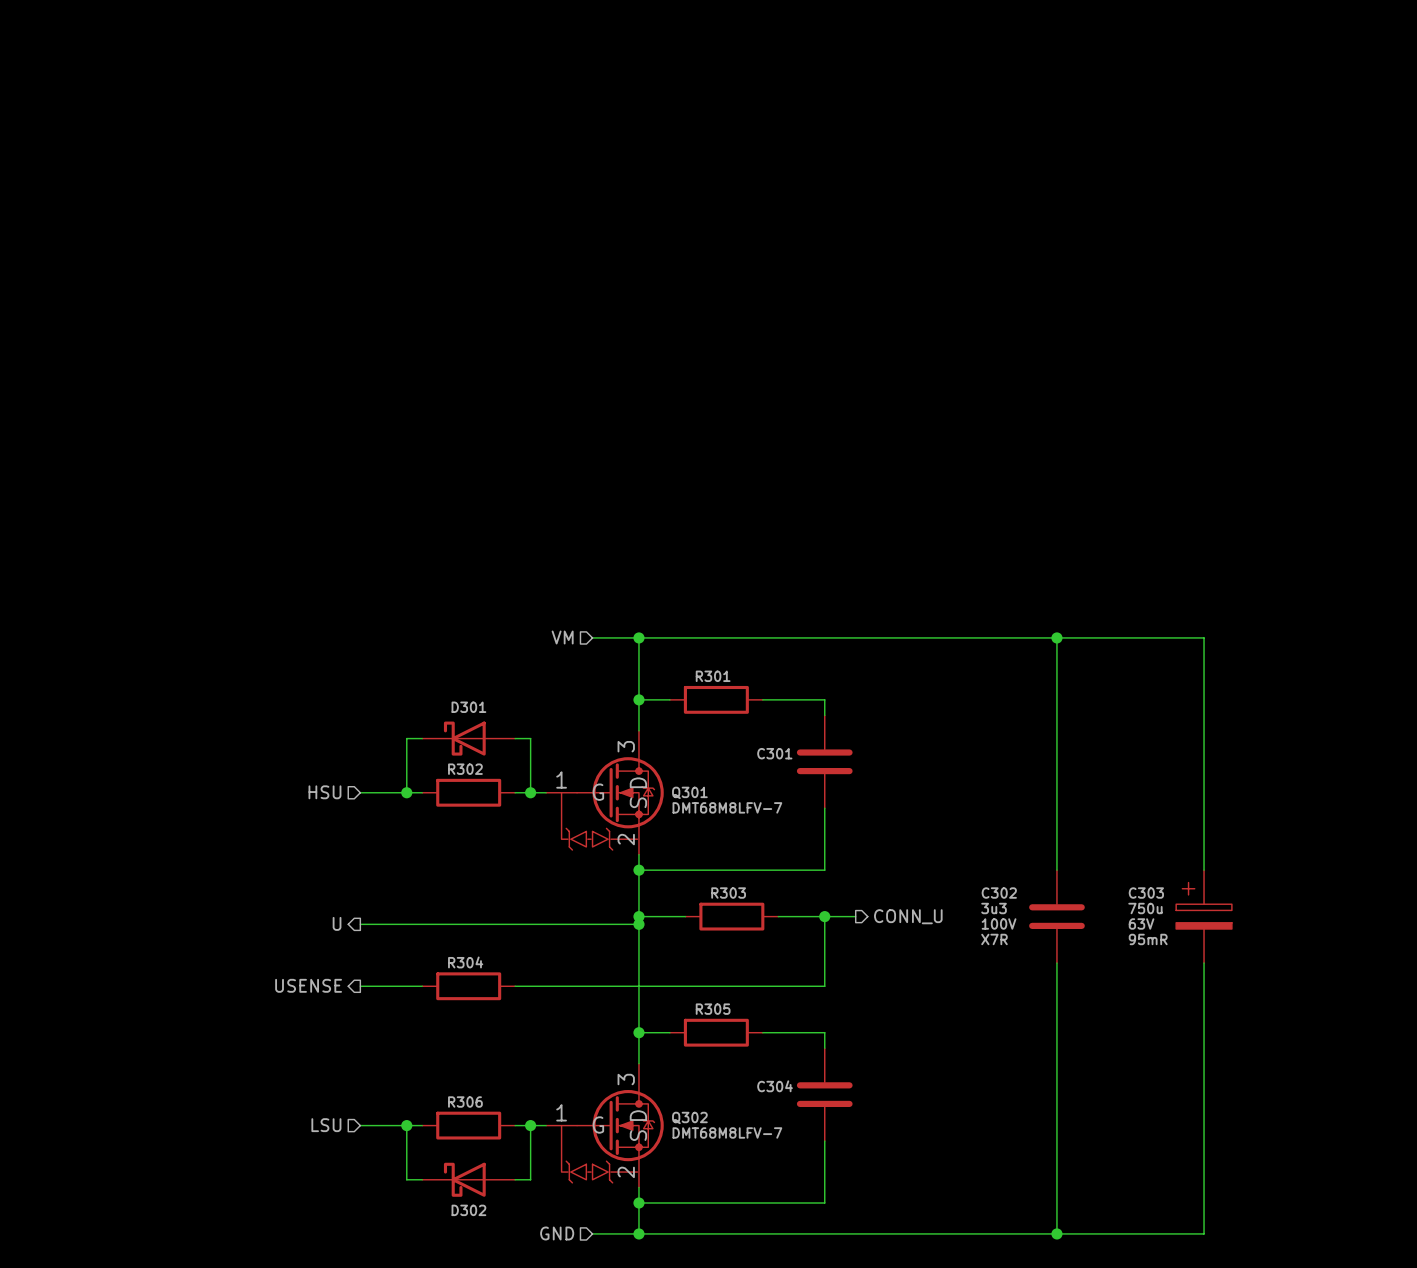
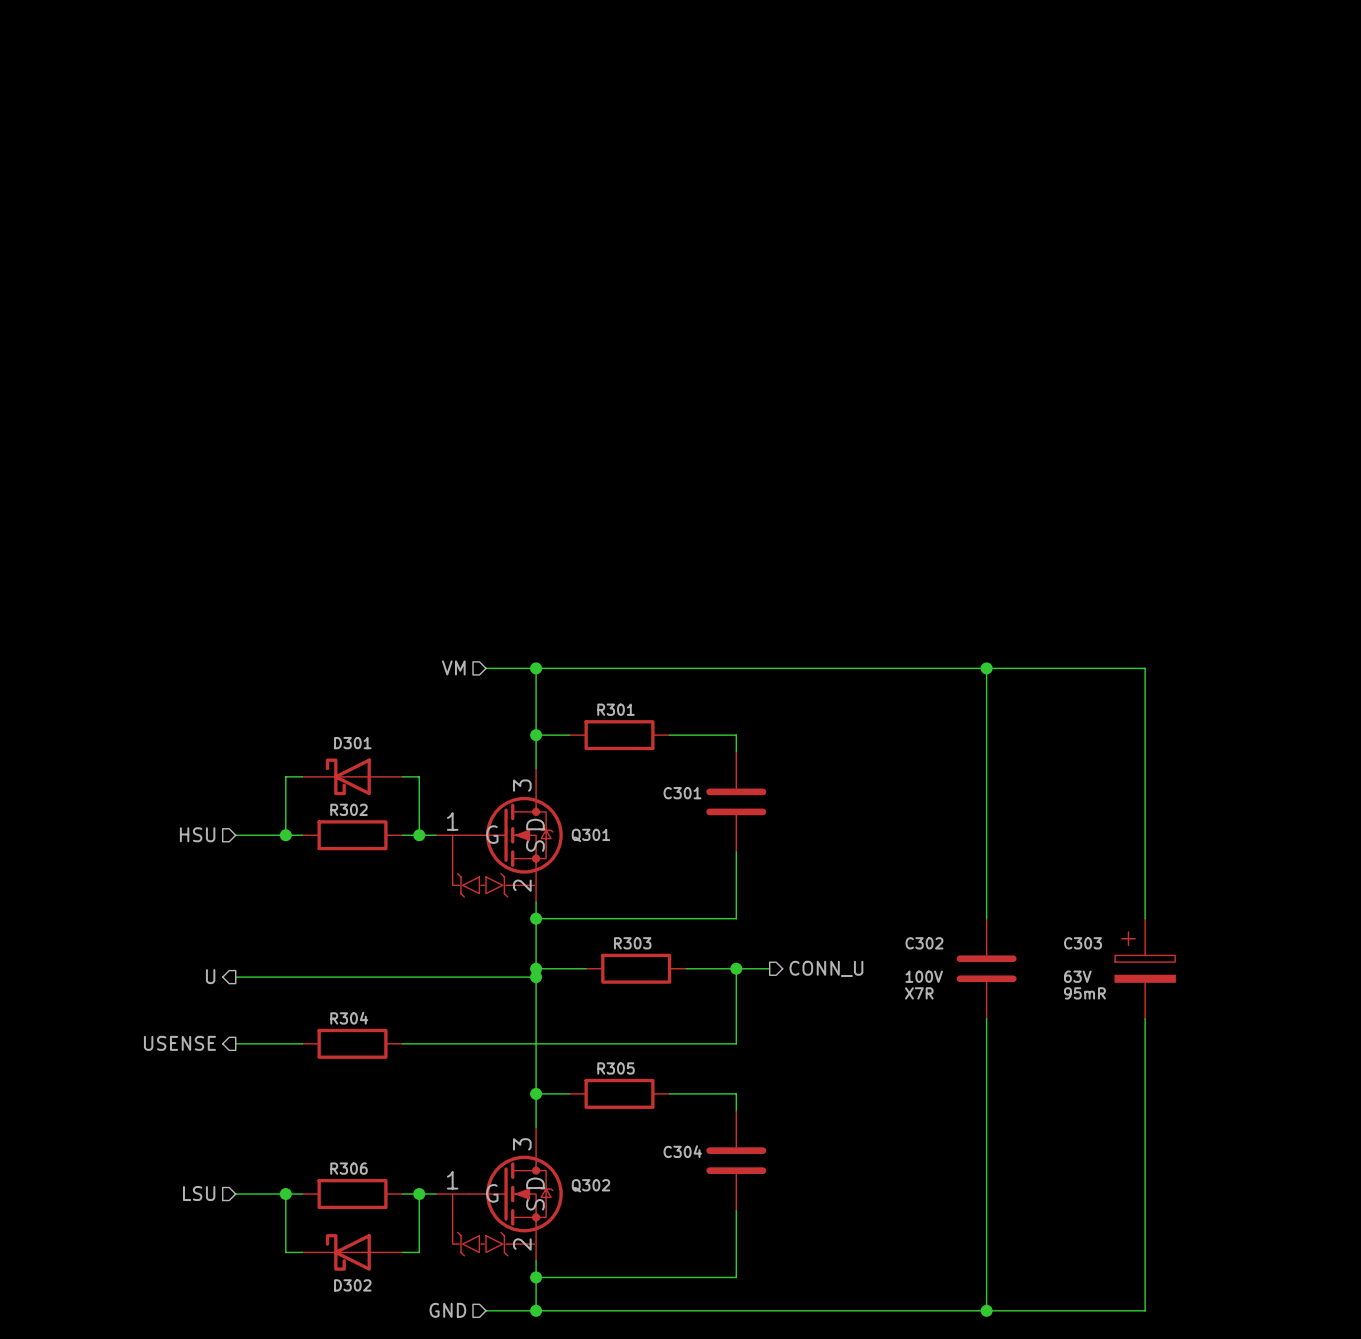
Q301 value: DMT68M8LFV-7 (727, 807) -> none
C302 value: 3u3 (994, 908) -> none
C303 value: 750u (1145, 908) -> none
Q302 value: DMT68M8LFV-7 (727, 1132) -> none

